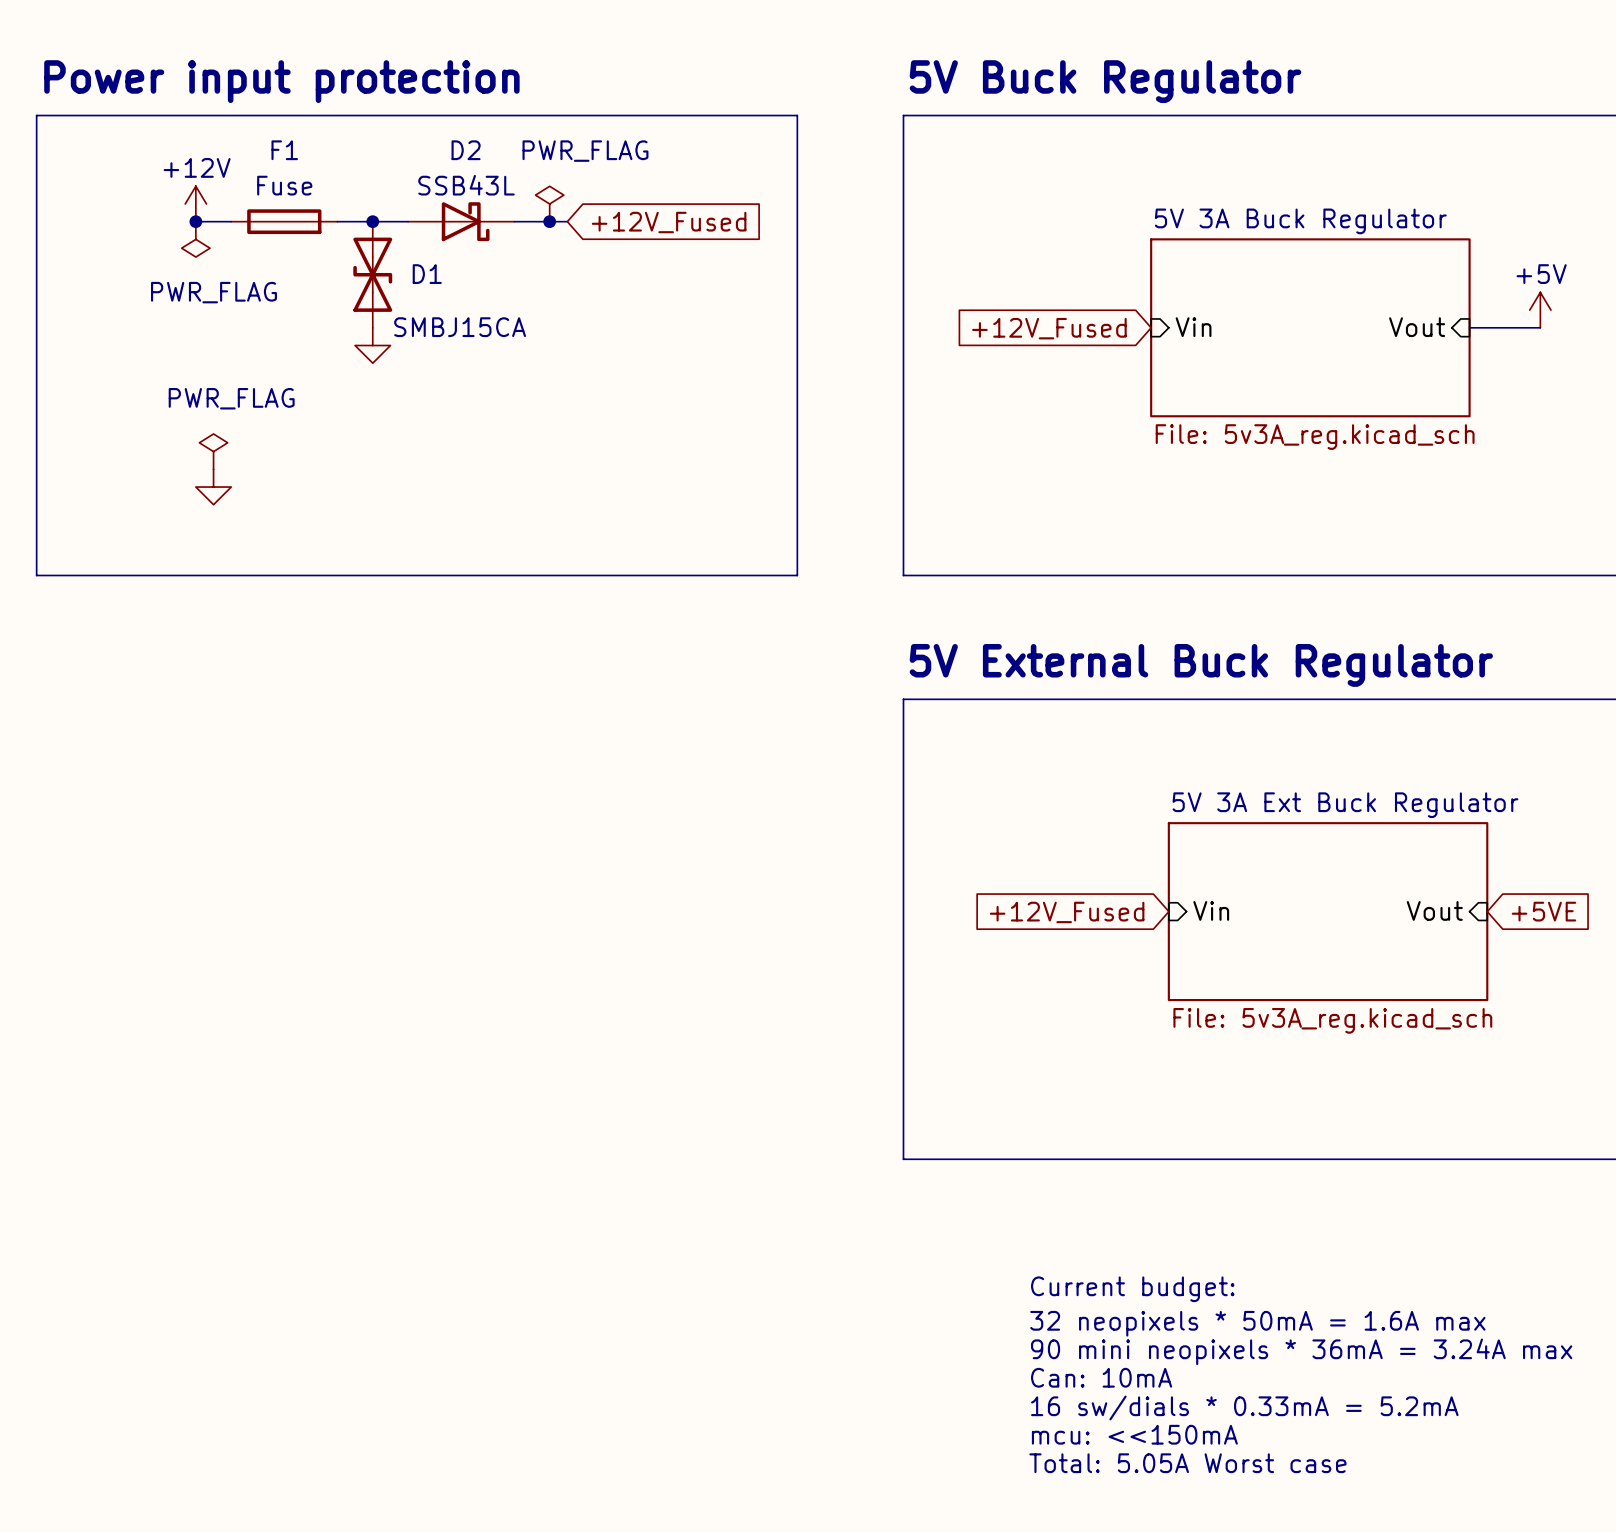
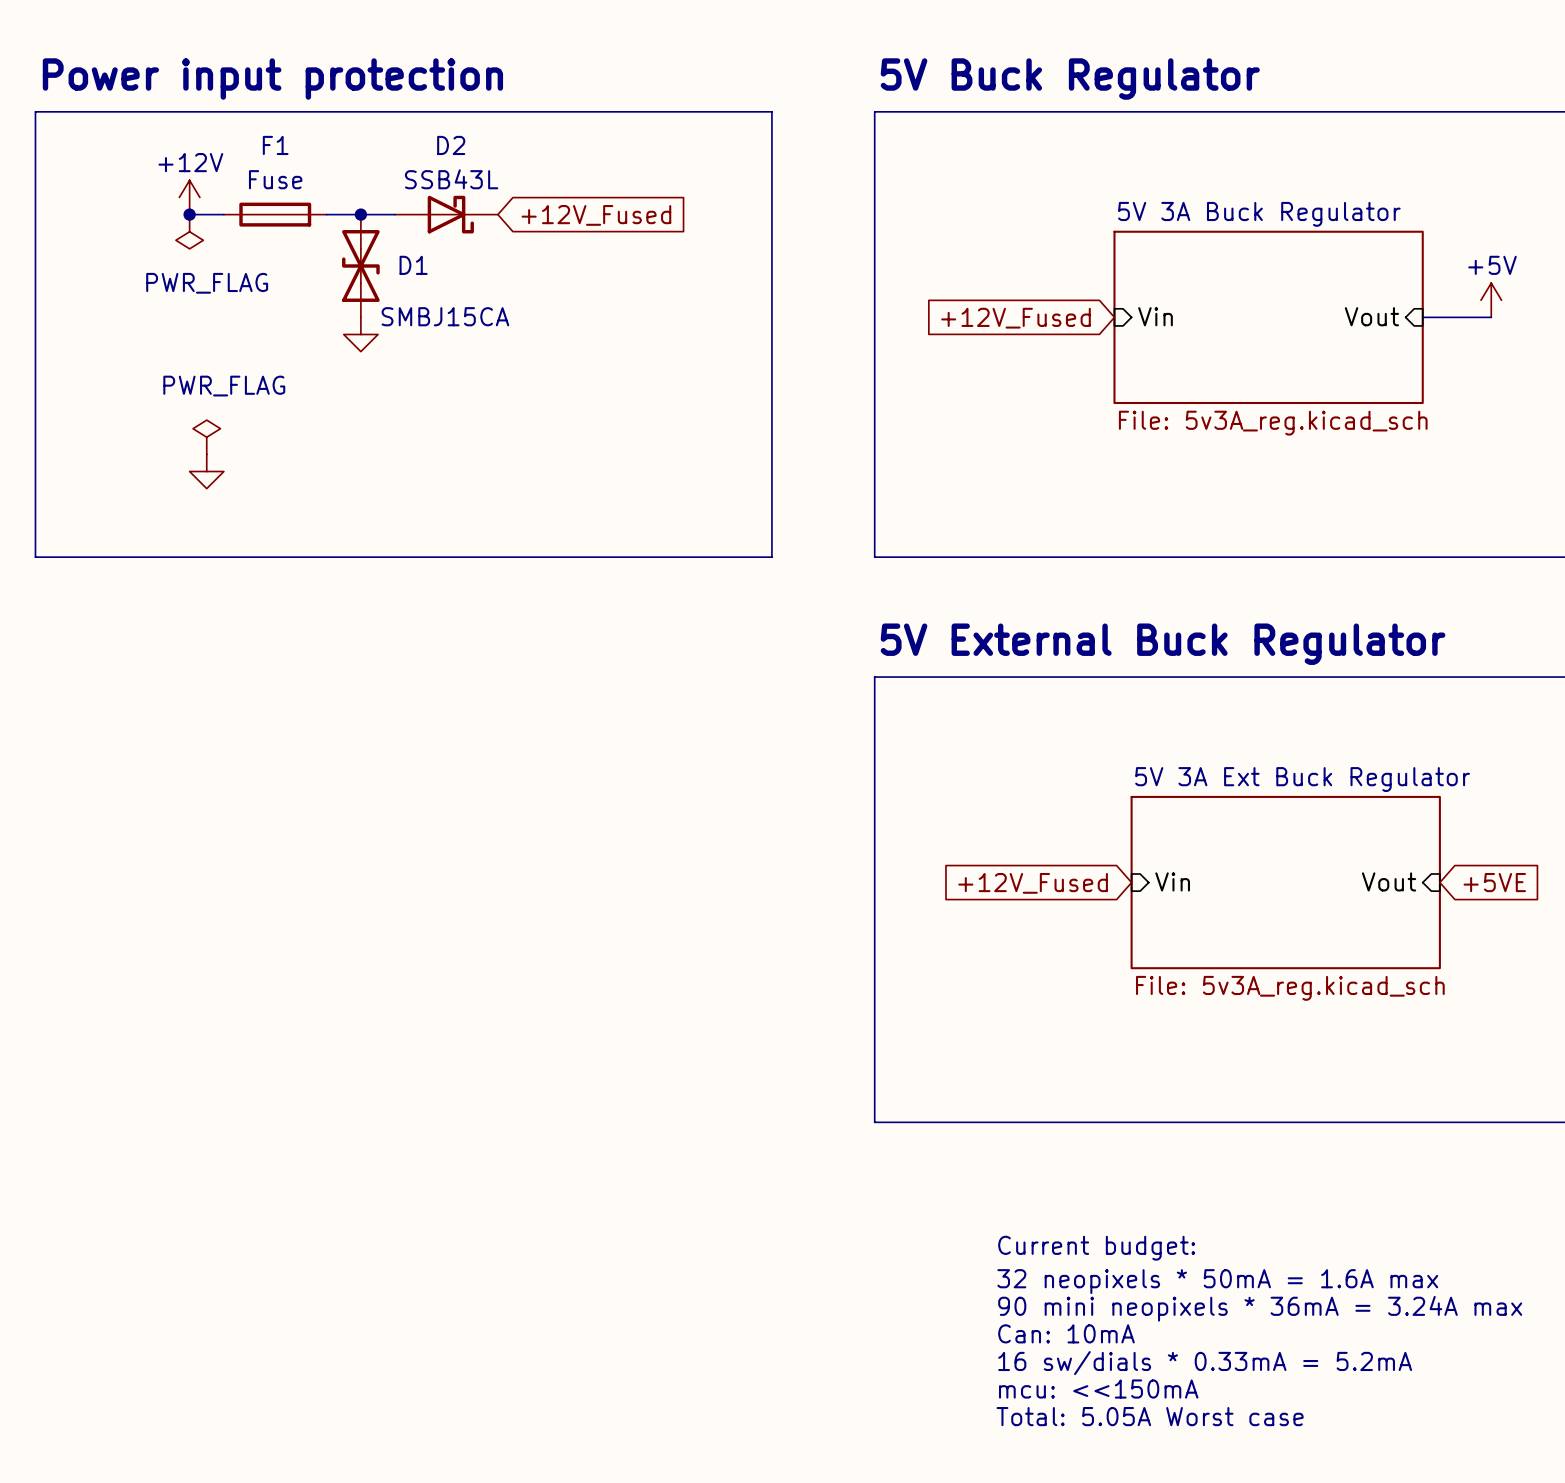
power symbol: PWR_FLAG (549, 203) -> none
wire: (514, 221) (567, 221) -> none
junction: (549, 221) -> none
global label position: +12V_Fused (669, 222) -> +12V_Fused (596, 215)

